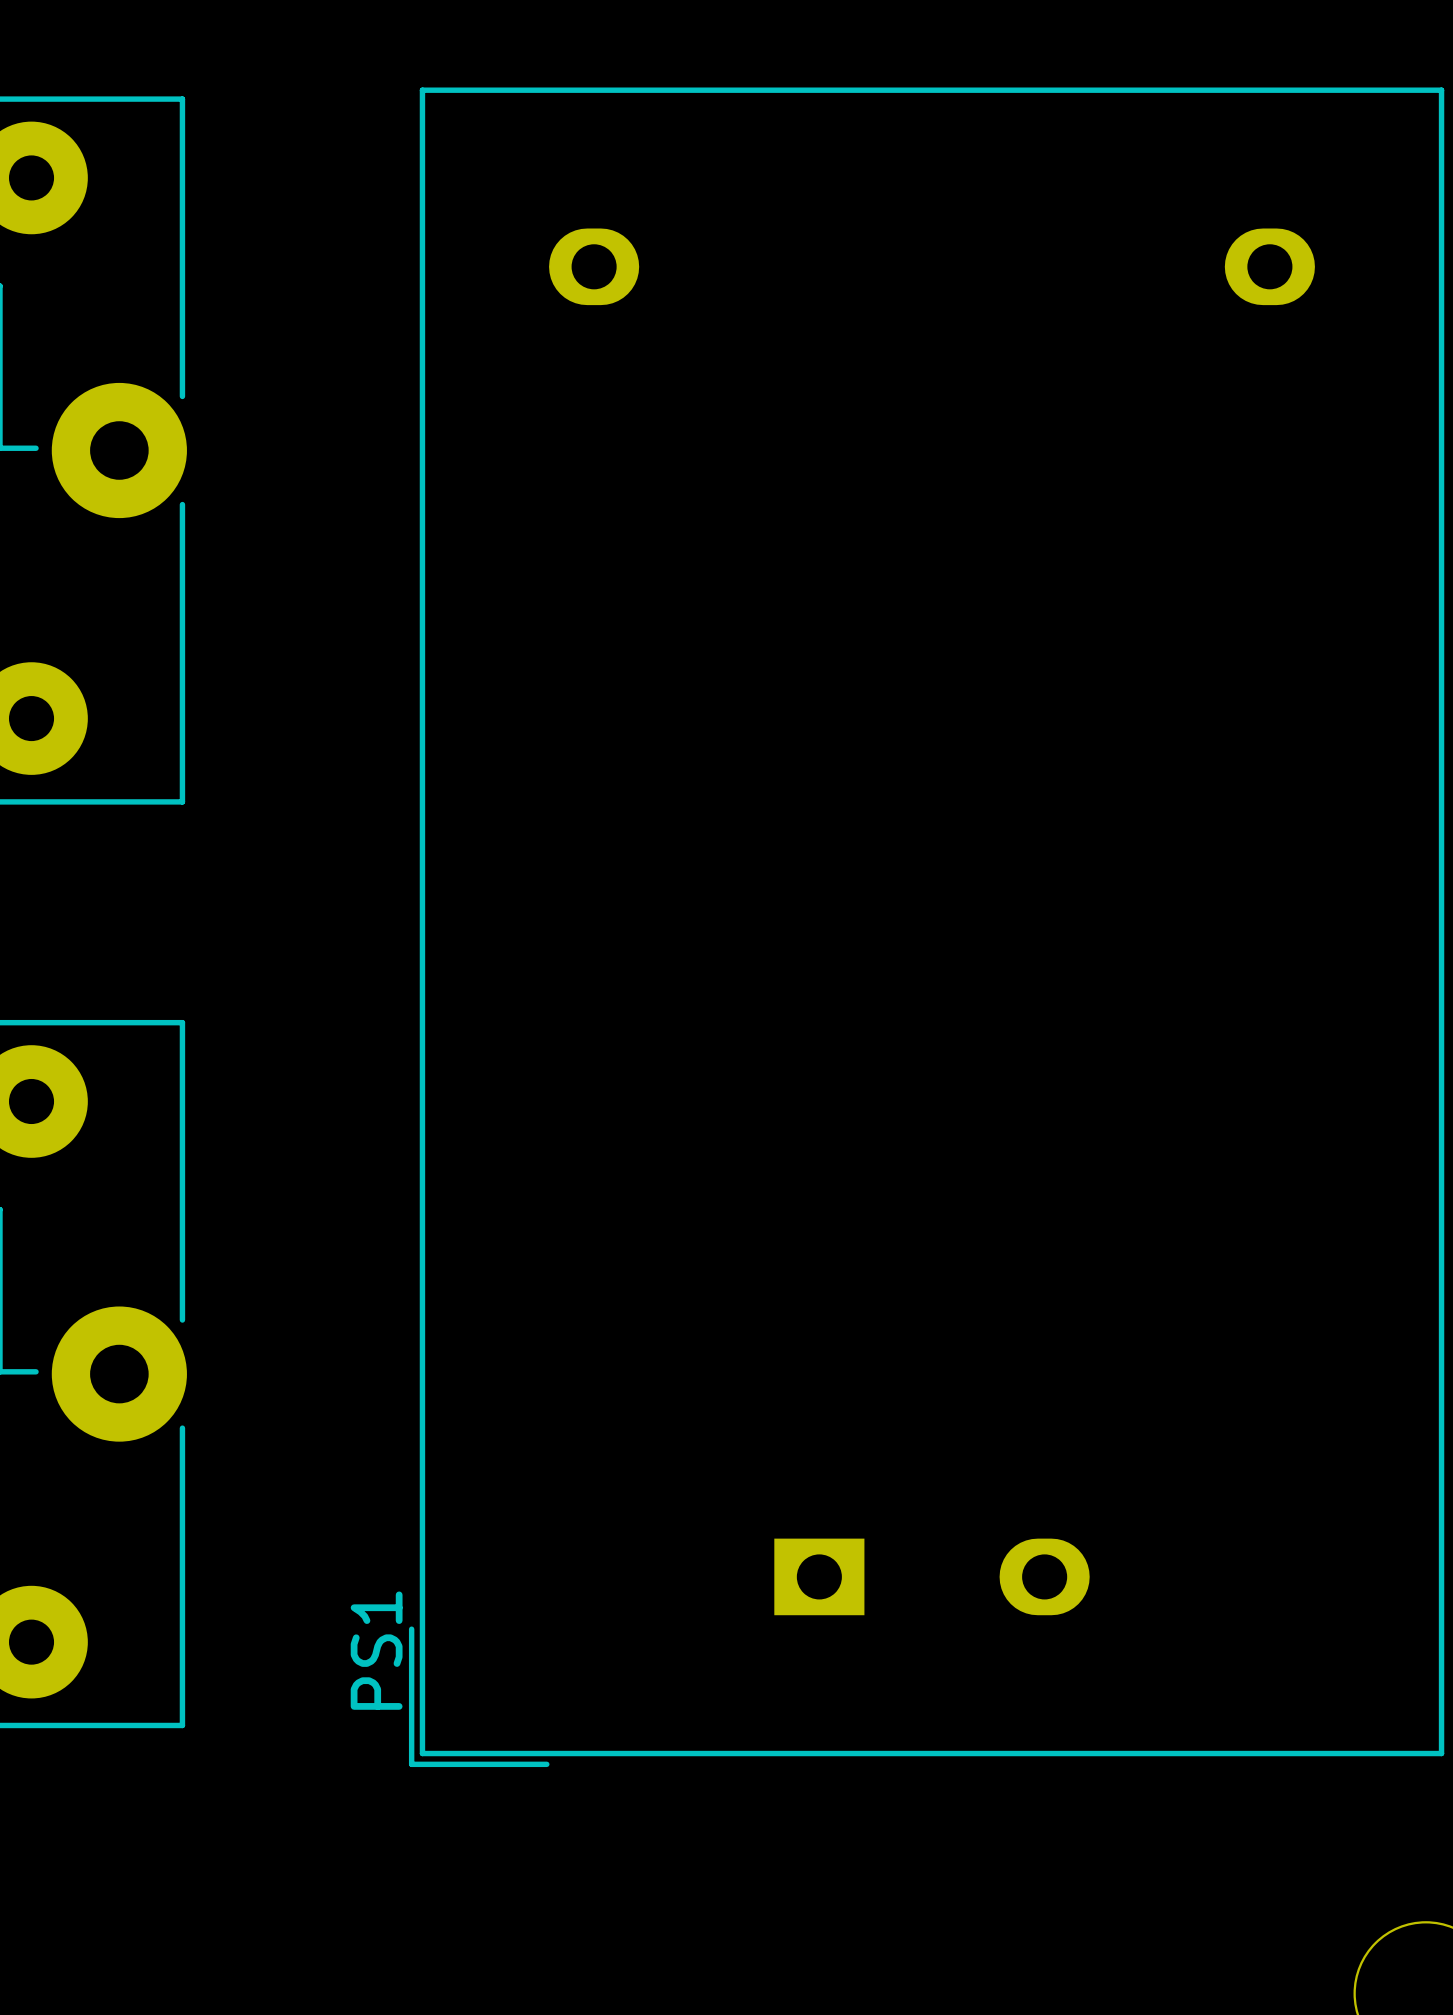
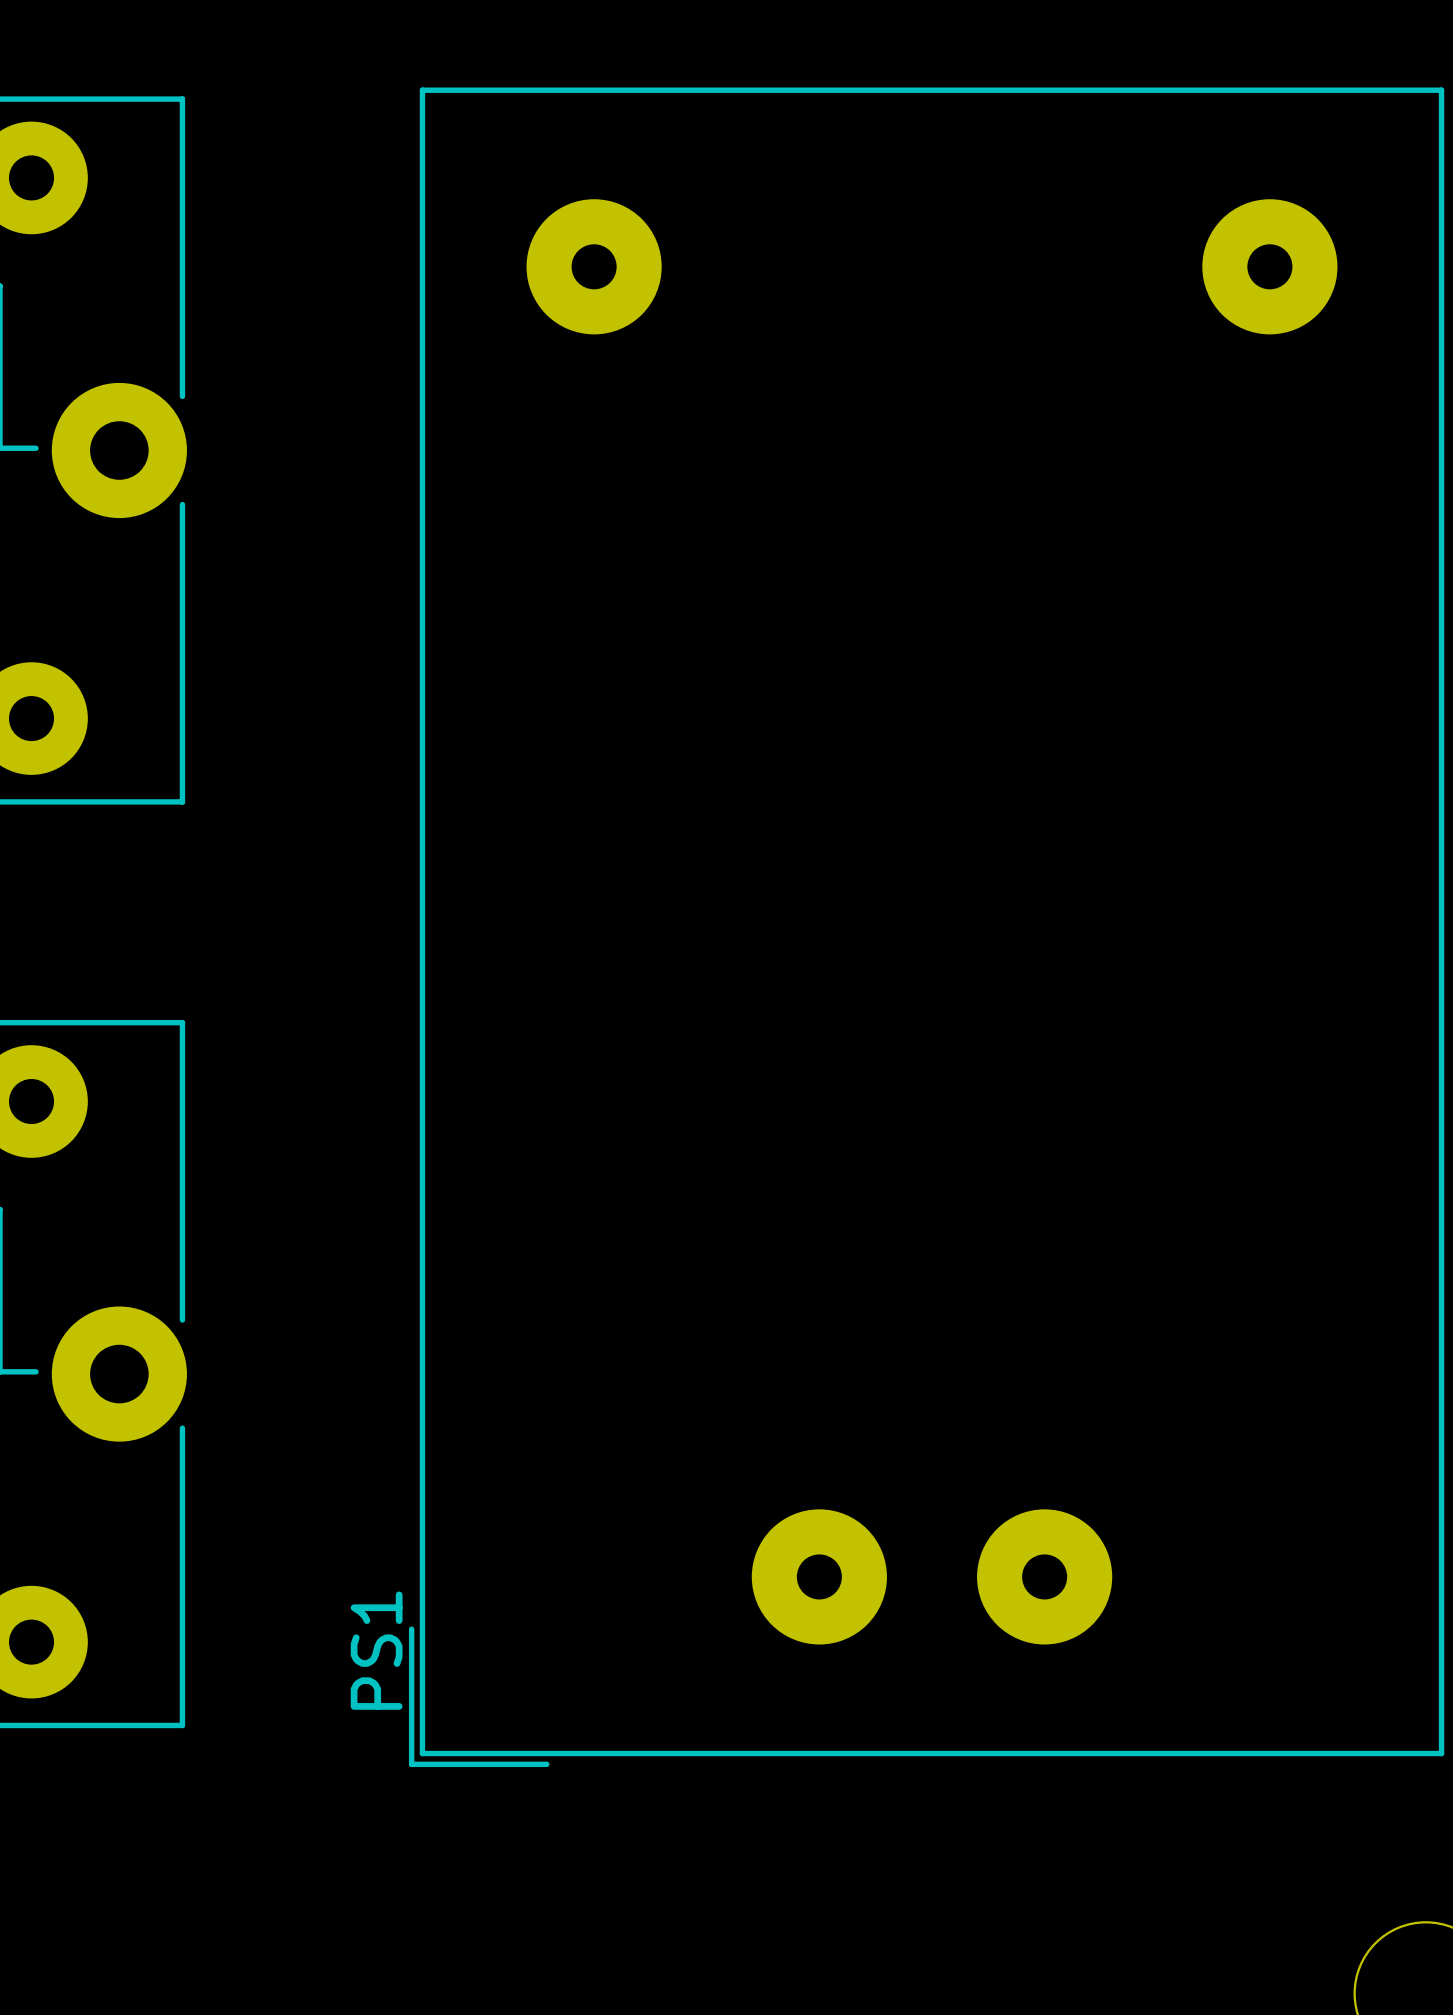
PS1 footprint: [408, 87, 1445, 1768] -> [408, 87, 1445, 1768]

